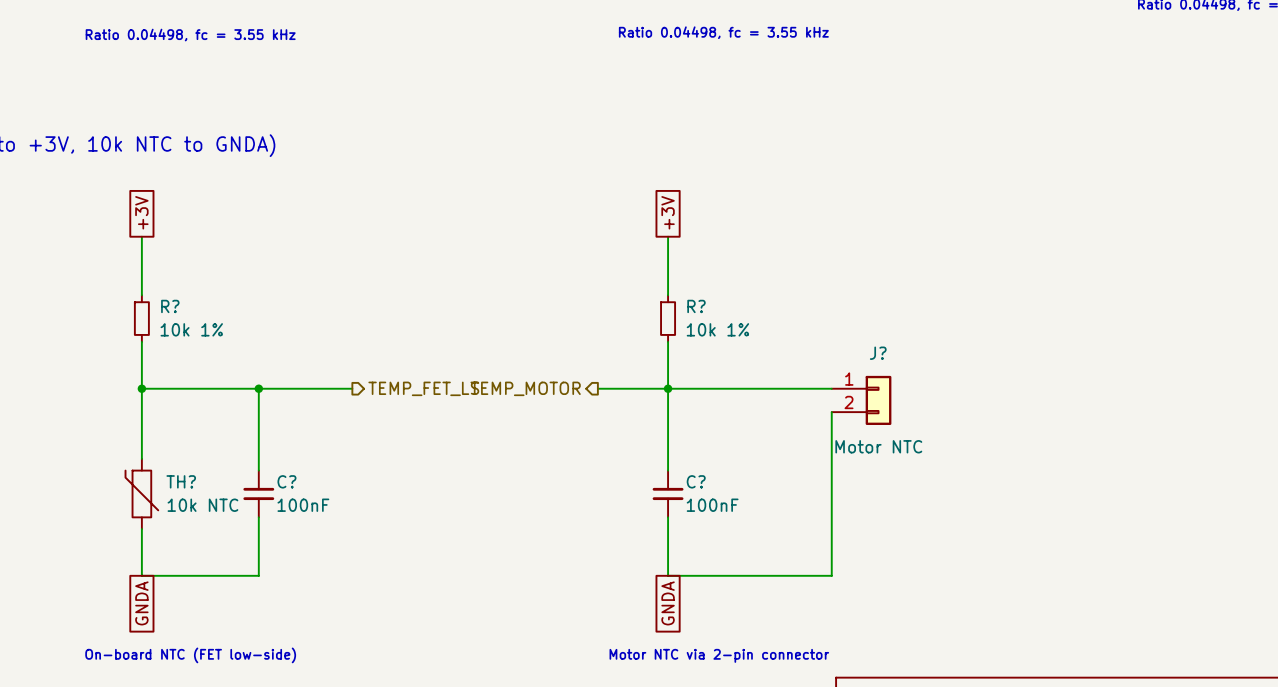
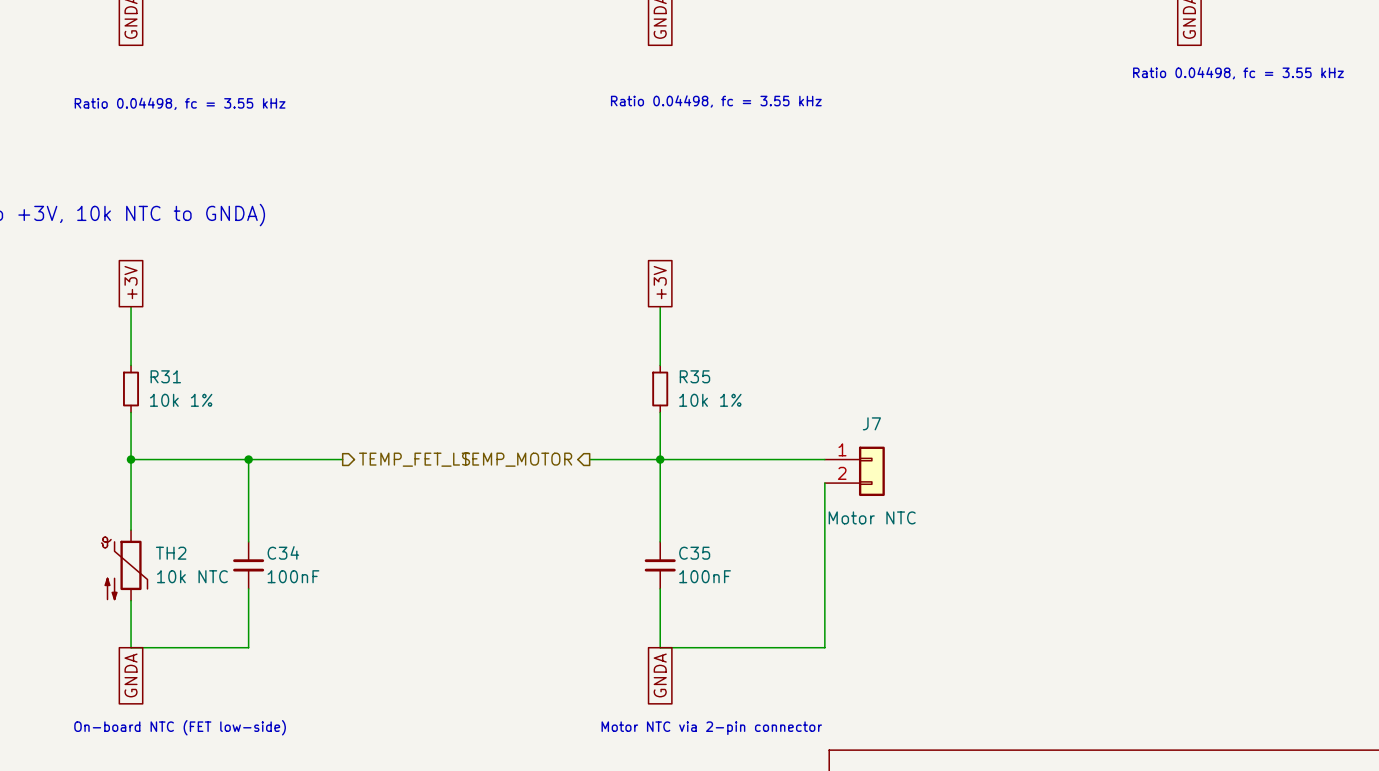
R? name: R? (170, 306) -> R31 (165, 376)
R? name: R? (696, 306) -> R35 (694, 376)
J? name: J? (878, 353) -> J7 (871, 423)
C? name: C? (286, 481) -> C34 (283, 552)
C? name: C? (696, 481) -> C35 (694, 553)
TH2: none -> 10k NTC (124, 565)
TH?: 10k NTC (141, 493) -> none

